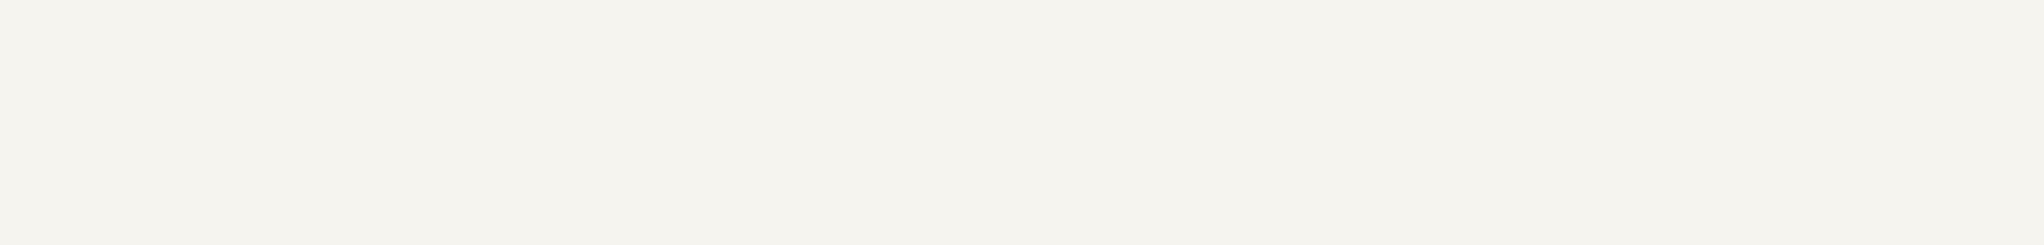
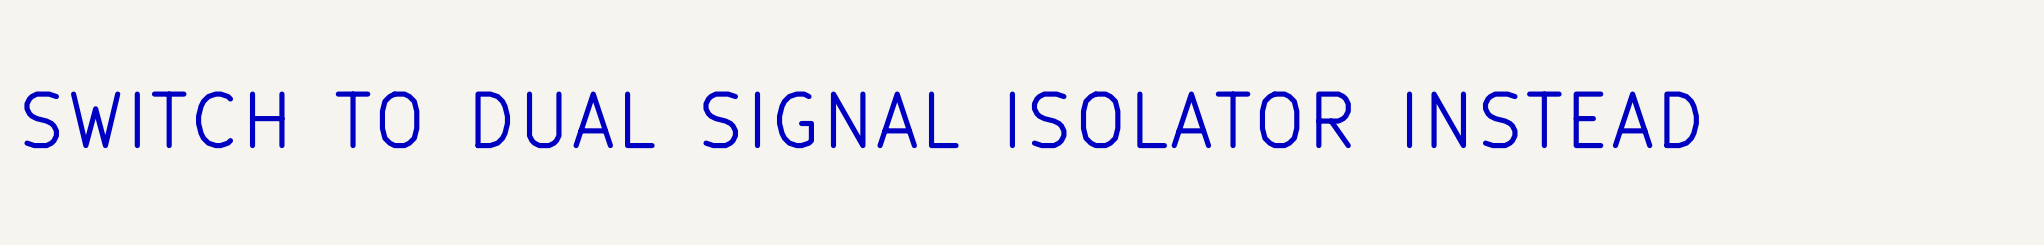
text: none -> SWITCH TO DUAL SIGNAL ISOLATOR INSTEAD (861, 119)

